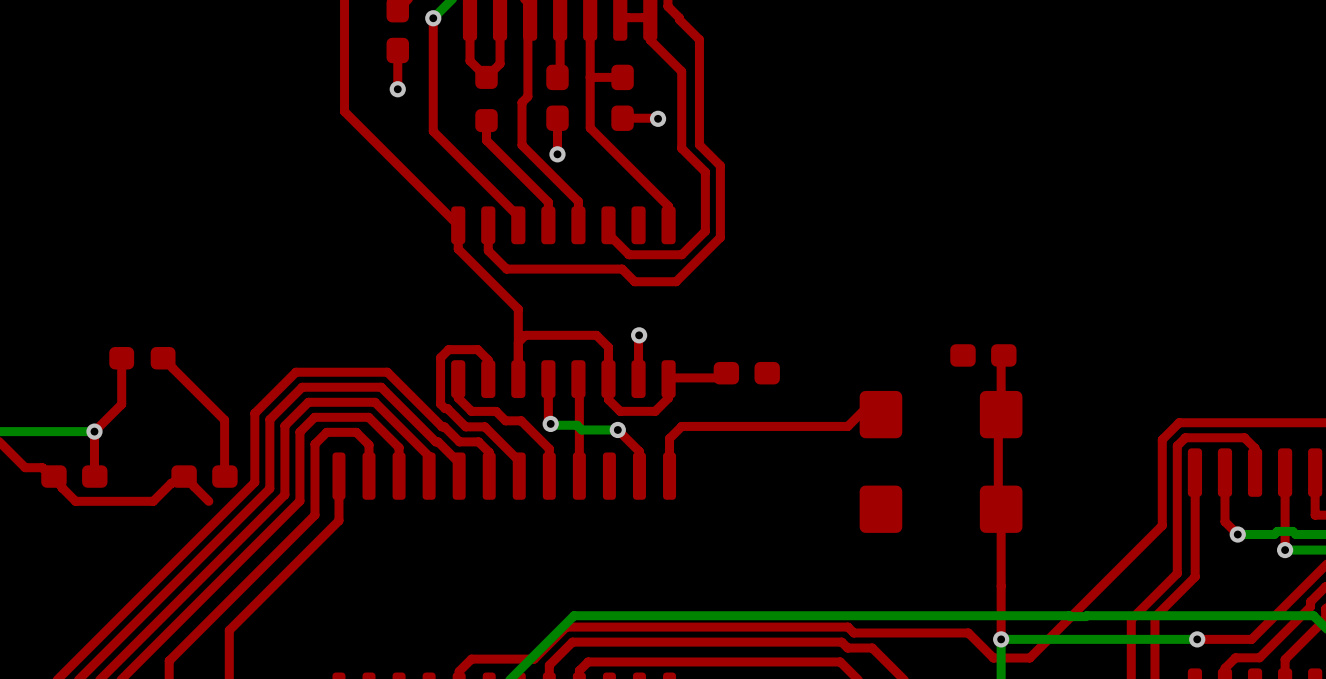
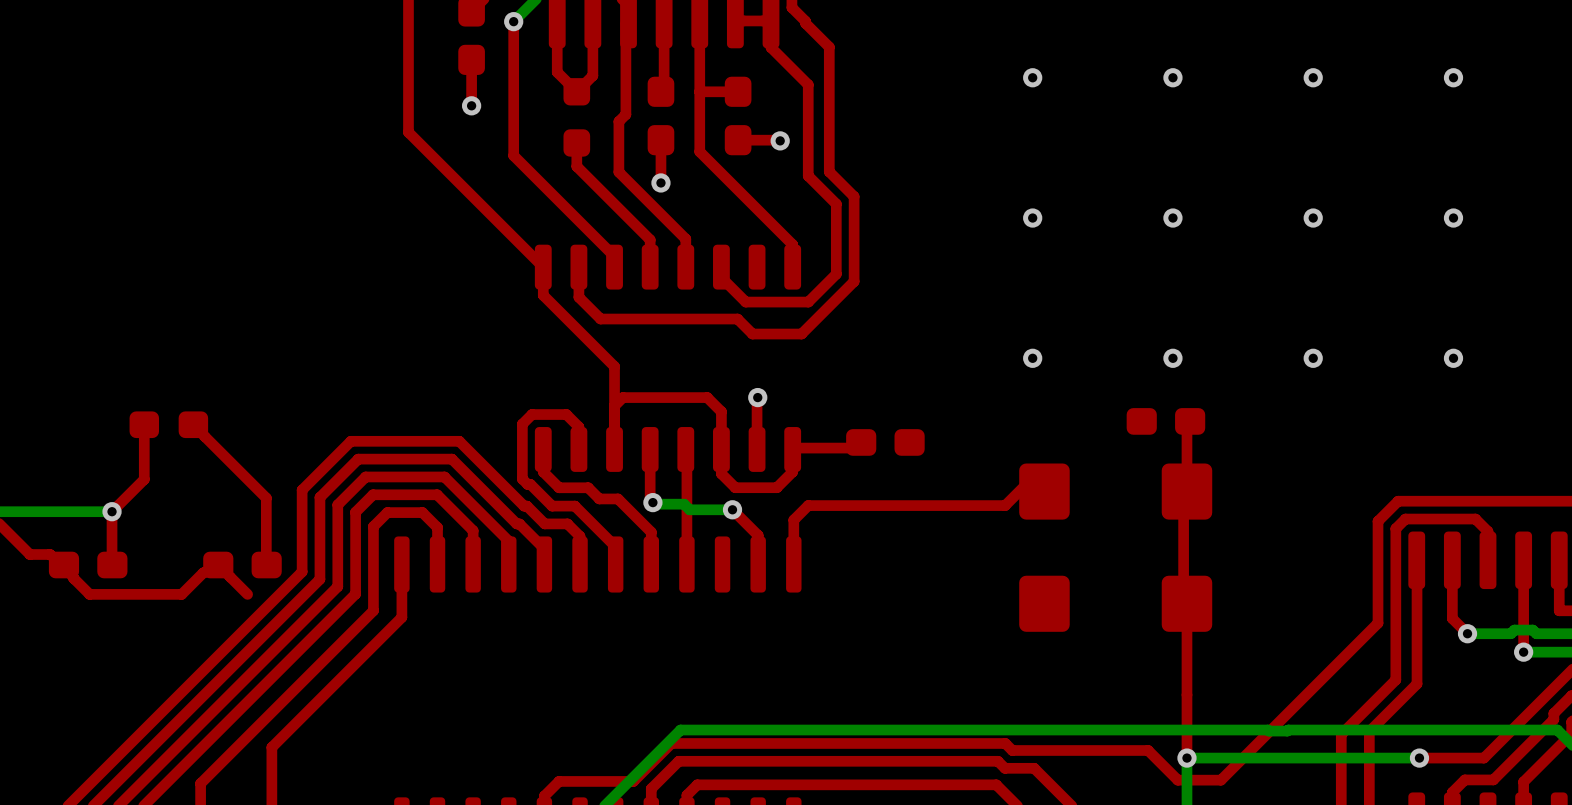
via: none -> (1032, 77)
via: none -> (1172, 77)
via: none -> (1313, 77)
via: none -> (1453, 77)
via: none -> (1032, 218)
via: none -> (1172, 218)
via: none -> (1313, 218)
via: none -> (1453, 218)
via: none -> (1032, 358)
via: none -> (1172, 358)
via: none -> (1313, 358)
via: none -> (1453, 358)

